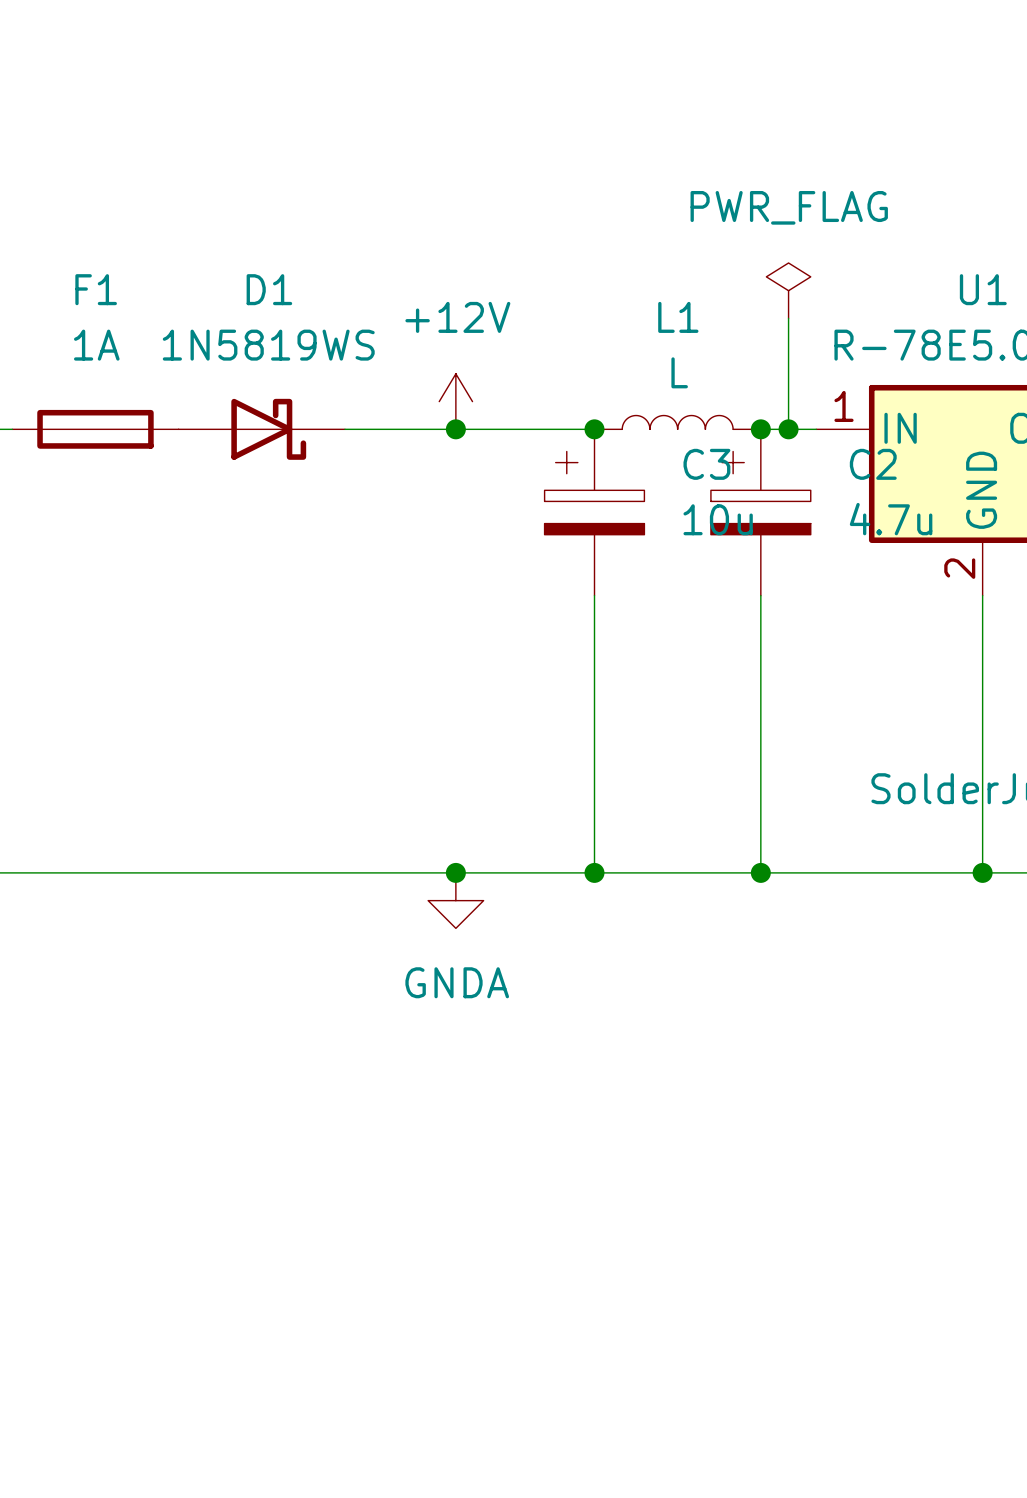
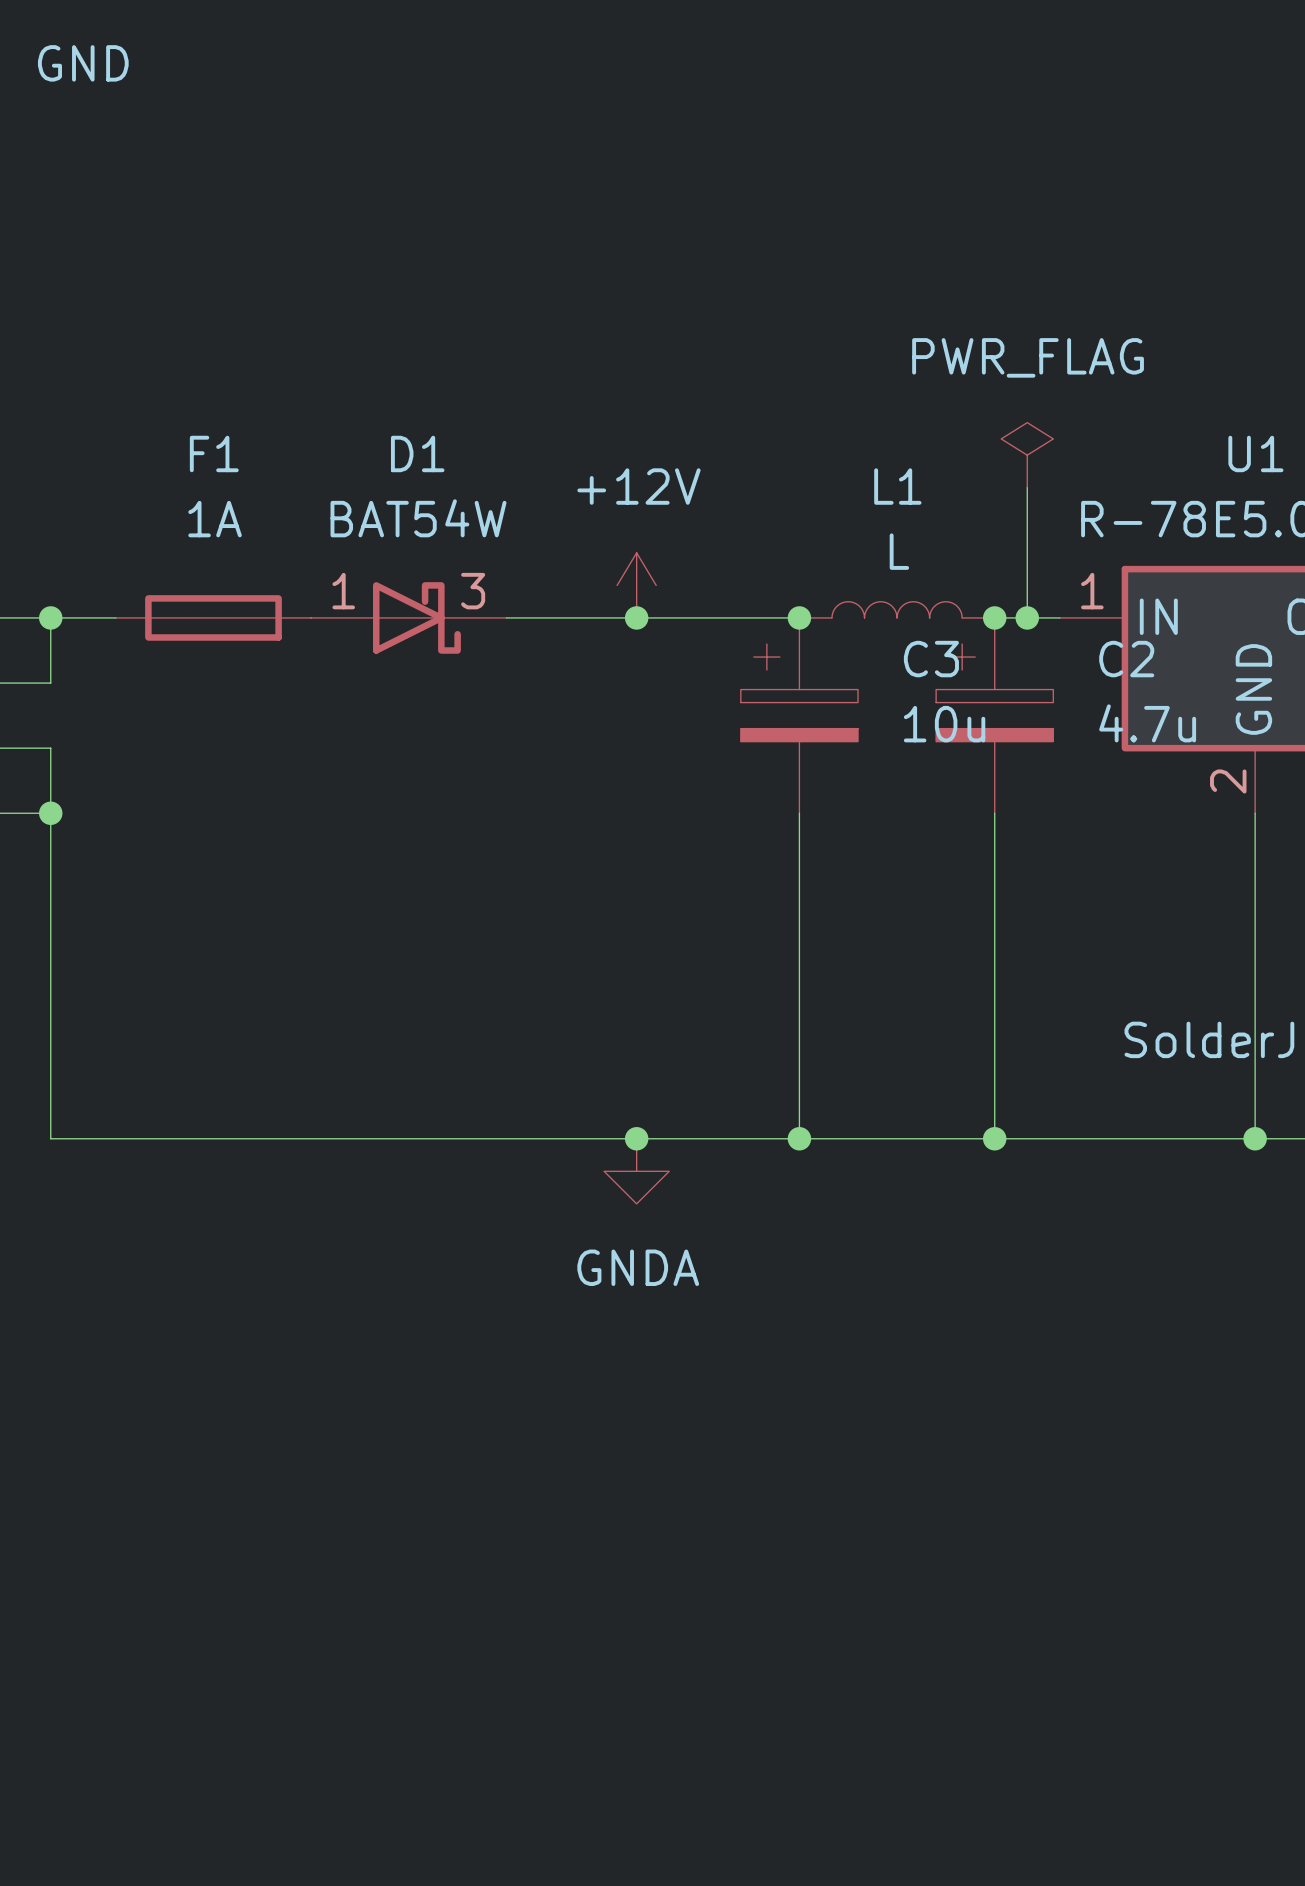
D1 value: 1N5819WS (268, 345) -> BAT54W (418, 518)
D1 pin number: none -> 1 (343, 591)
D1 pin number: none -> 3 (473, 591)

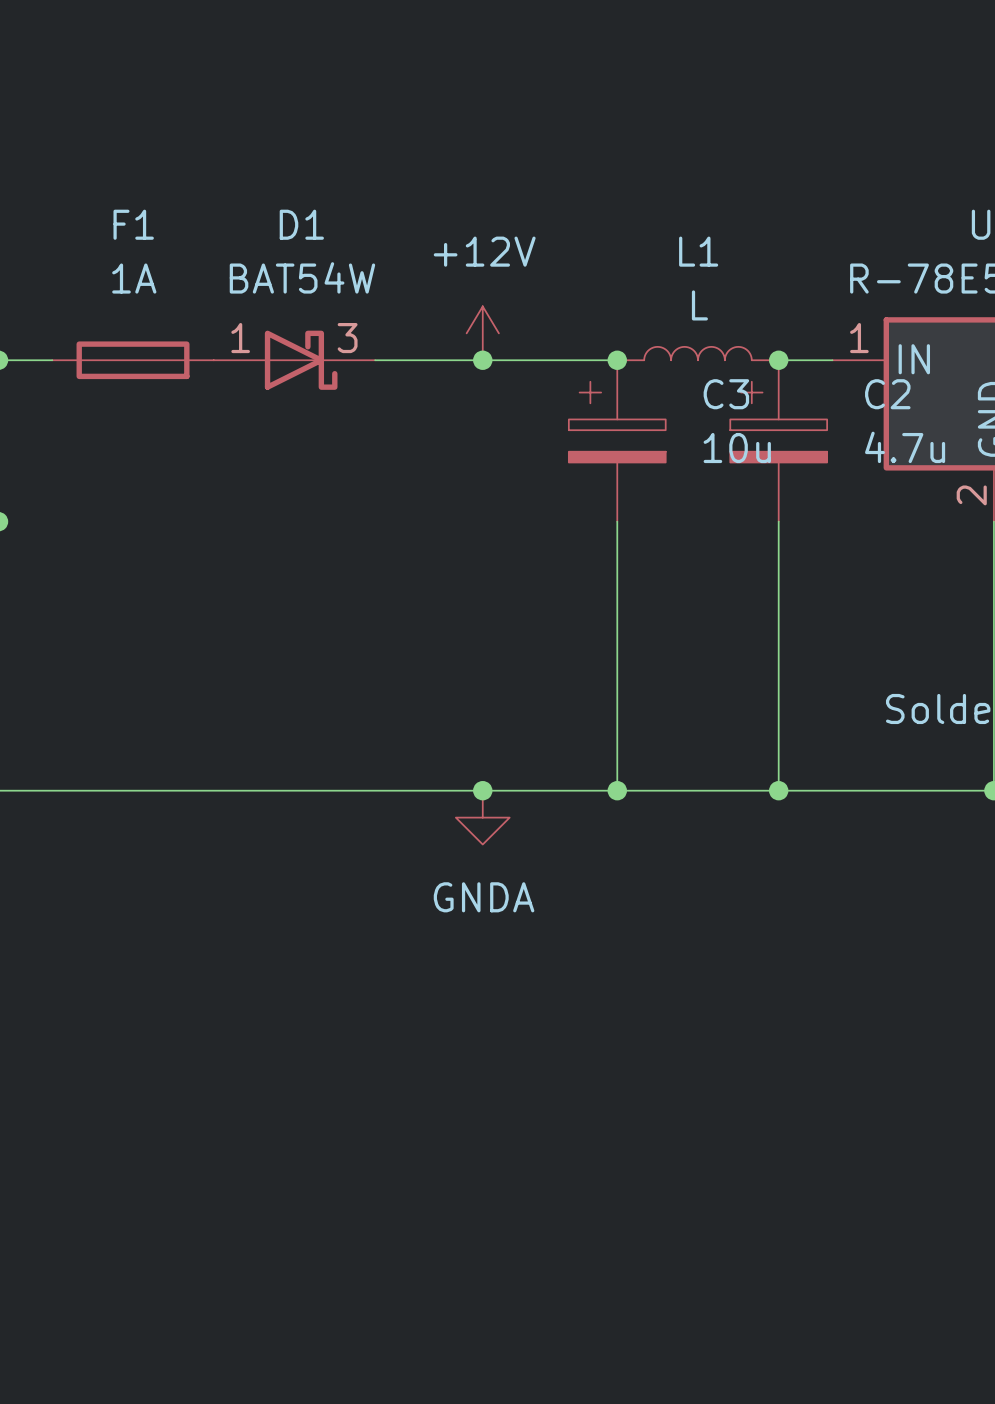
power symbol: PWR_FLAG (1027, 455) -> none
wire: (1027, 487) (1027, 617) -> none
junction: (1027, 617) -> none

